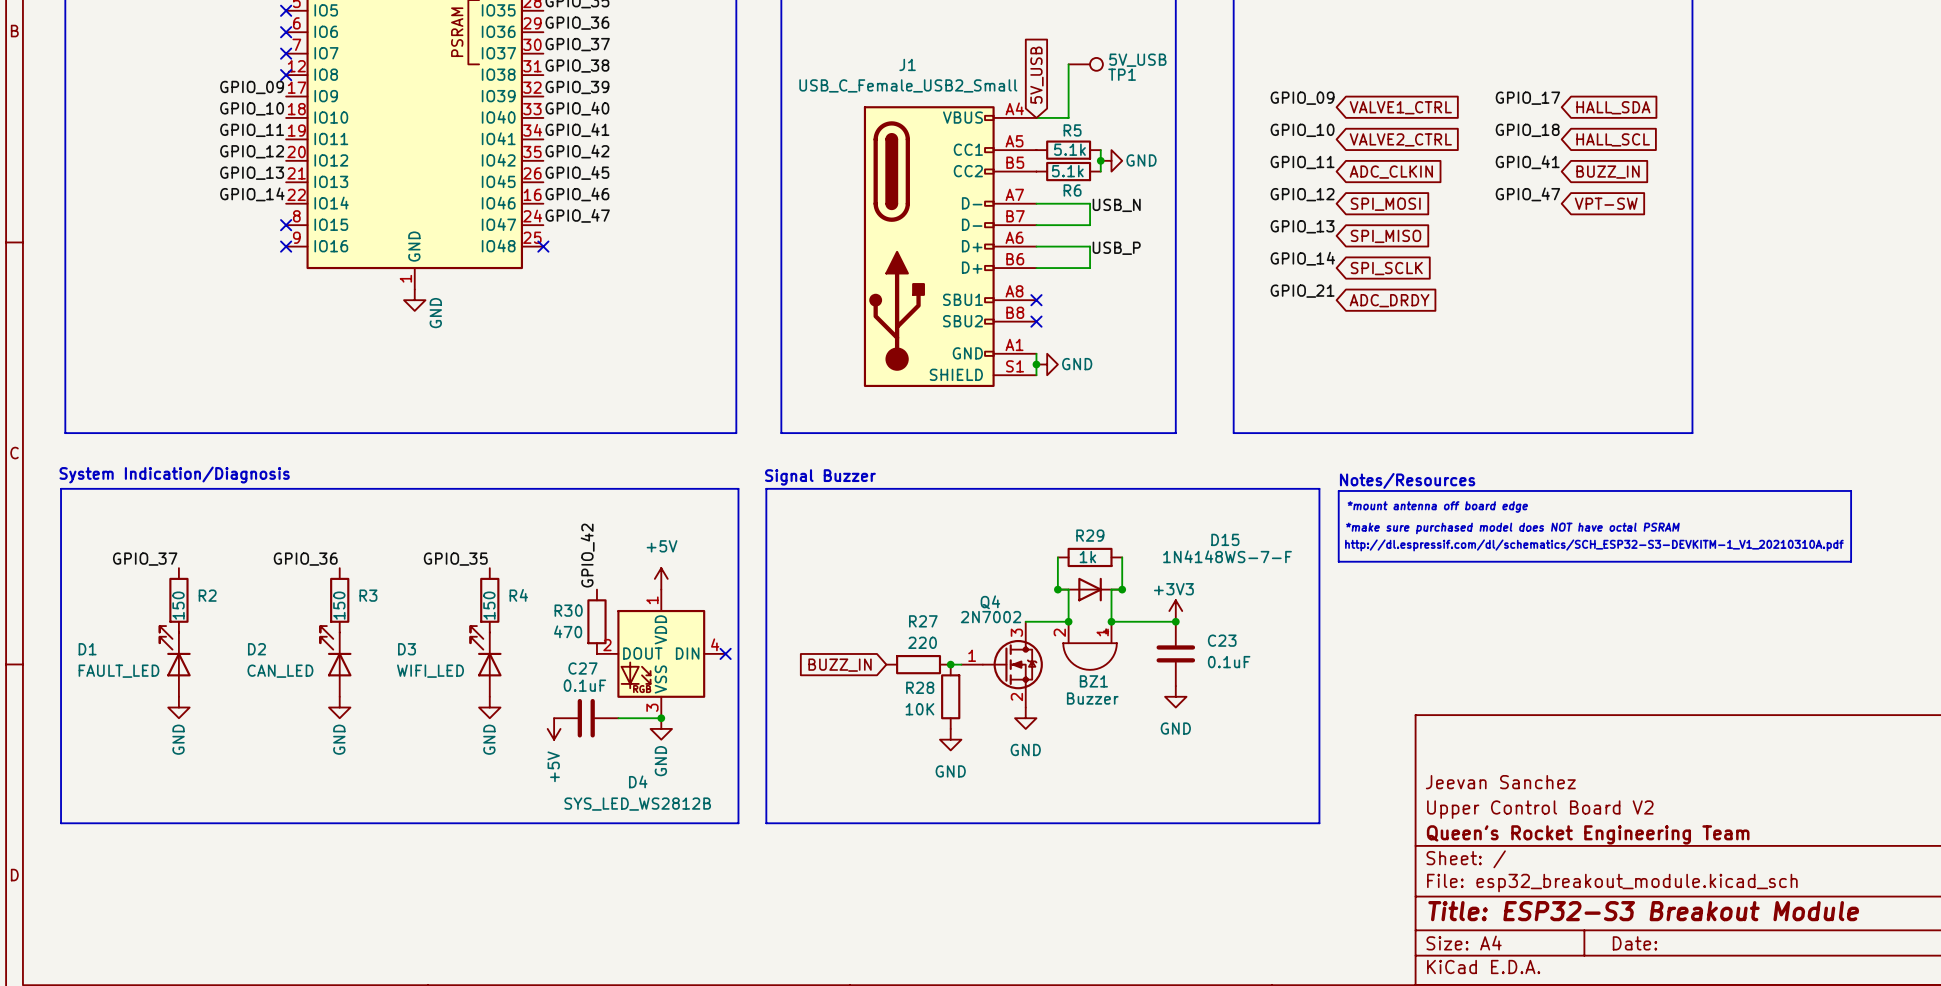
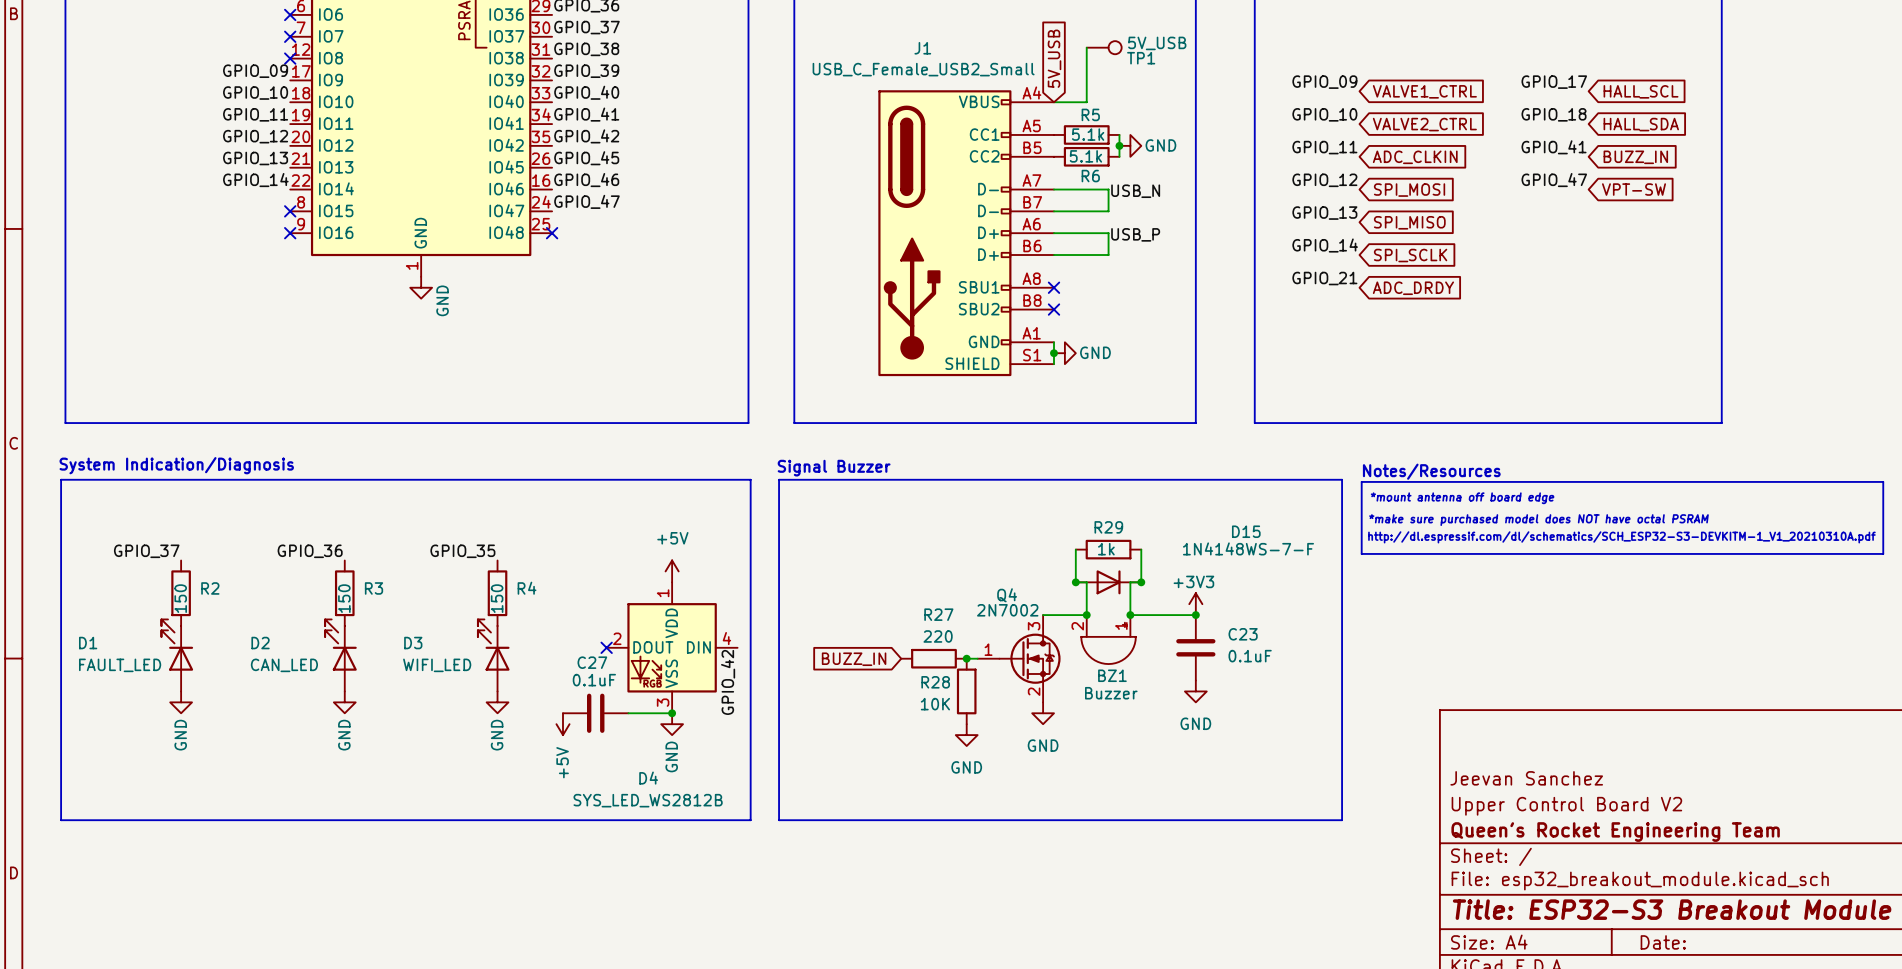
global label: HALL_SDA (1613, 107) -> HALL_SCL (1641, 91)
global label: HALL_SCL (1613, 139) -> HALL_SDA (1641, 124)
label position: GPIO_42 (587, 555) -> GPIO_42 (728, 682)
R30: 470 (596, 621) -> none
no-connect mark: none -> (606, 647)
no-connect mark: (725, 653) -> none

